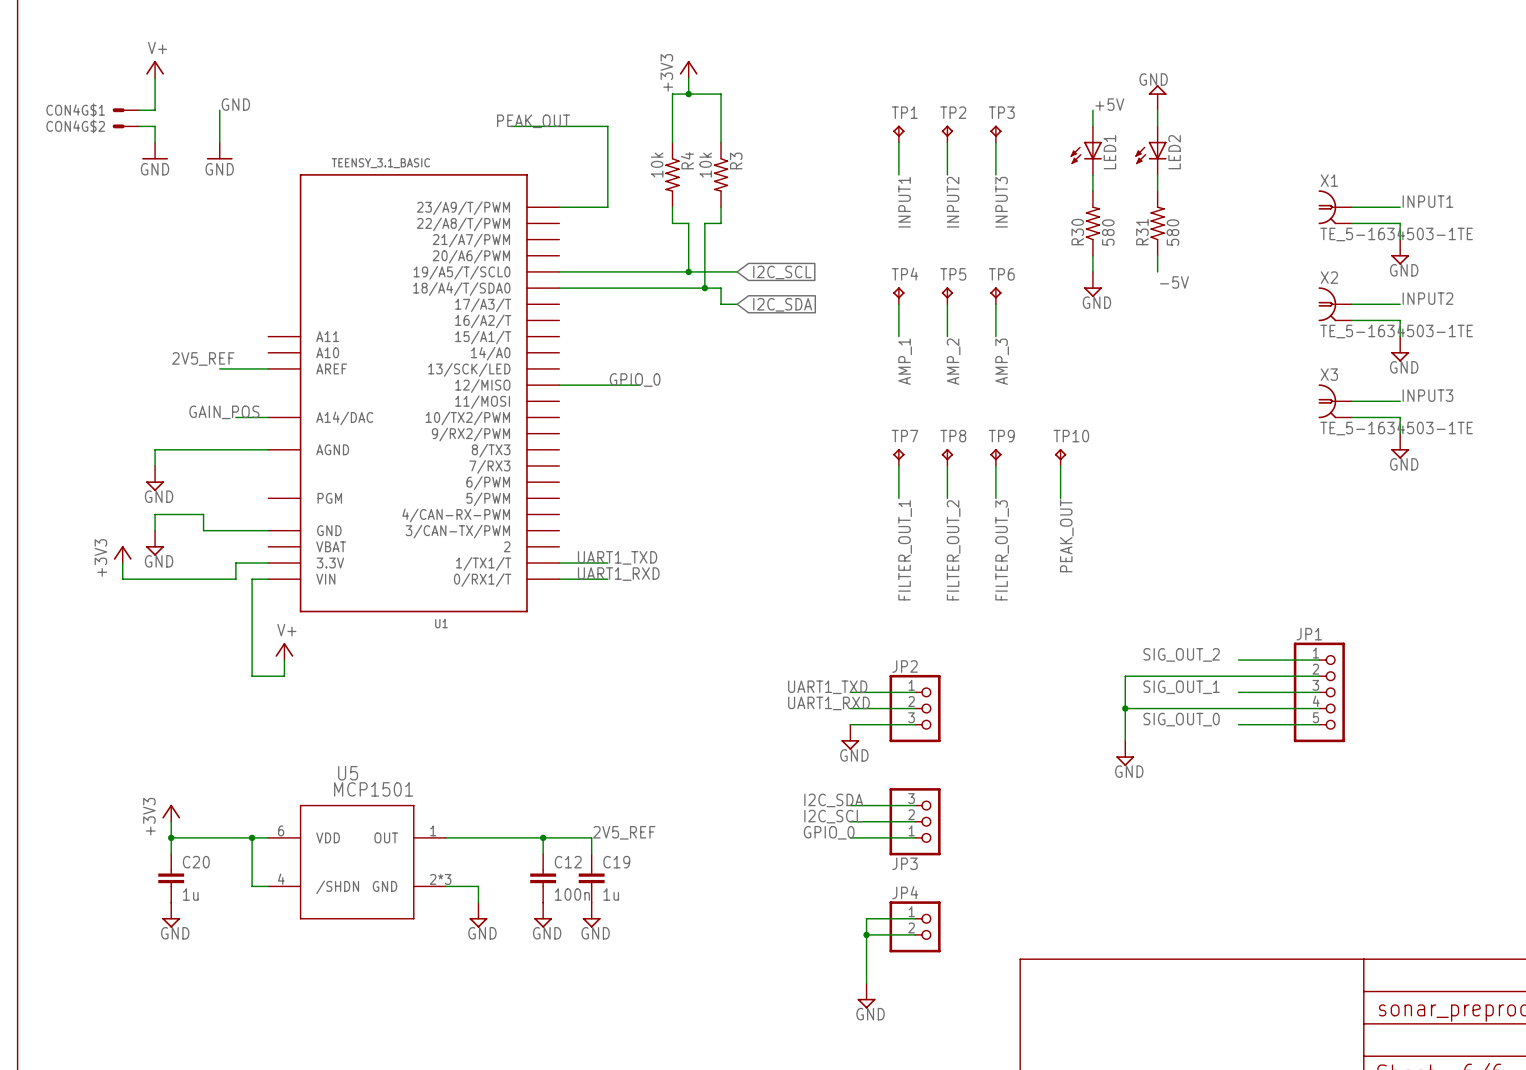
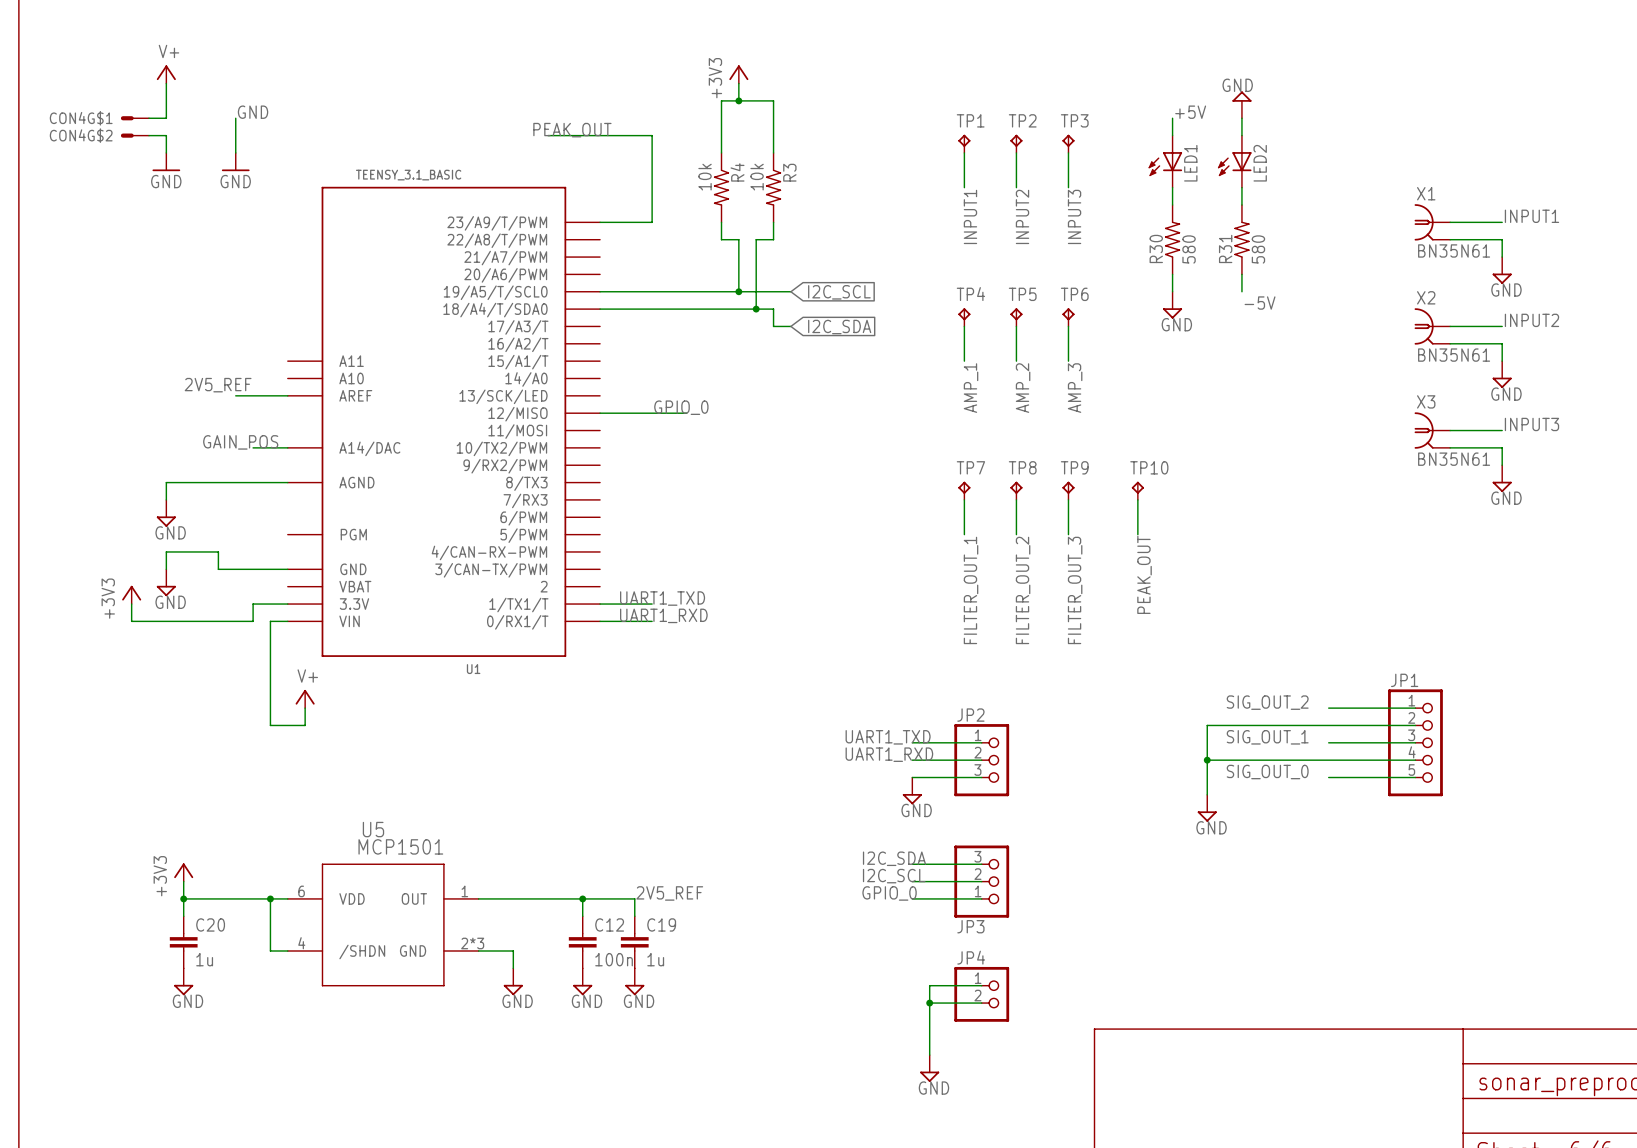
X1 value: TE_5-1634503-1TE (1396, 234) -> BN35N61 (1454, 250)
X2 value: TE_5-1634503-1TE (1396, 331) -> BN35N61 (1454, 355)
X3 value: TE_5-1634503-1TE (1396, 428) -> BN35N61 (1454, 459)

